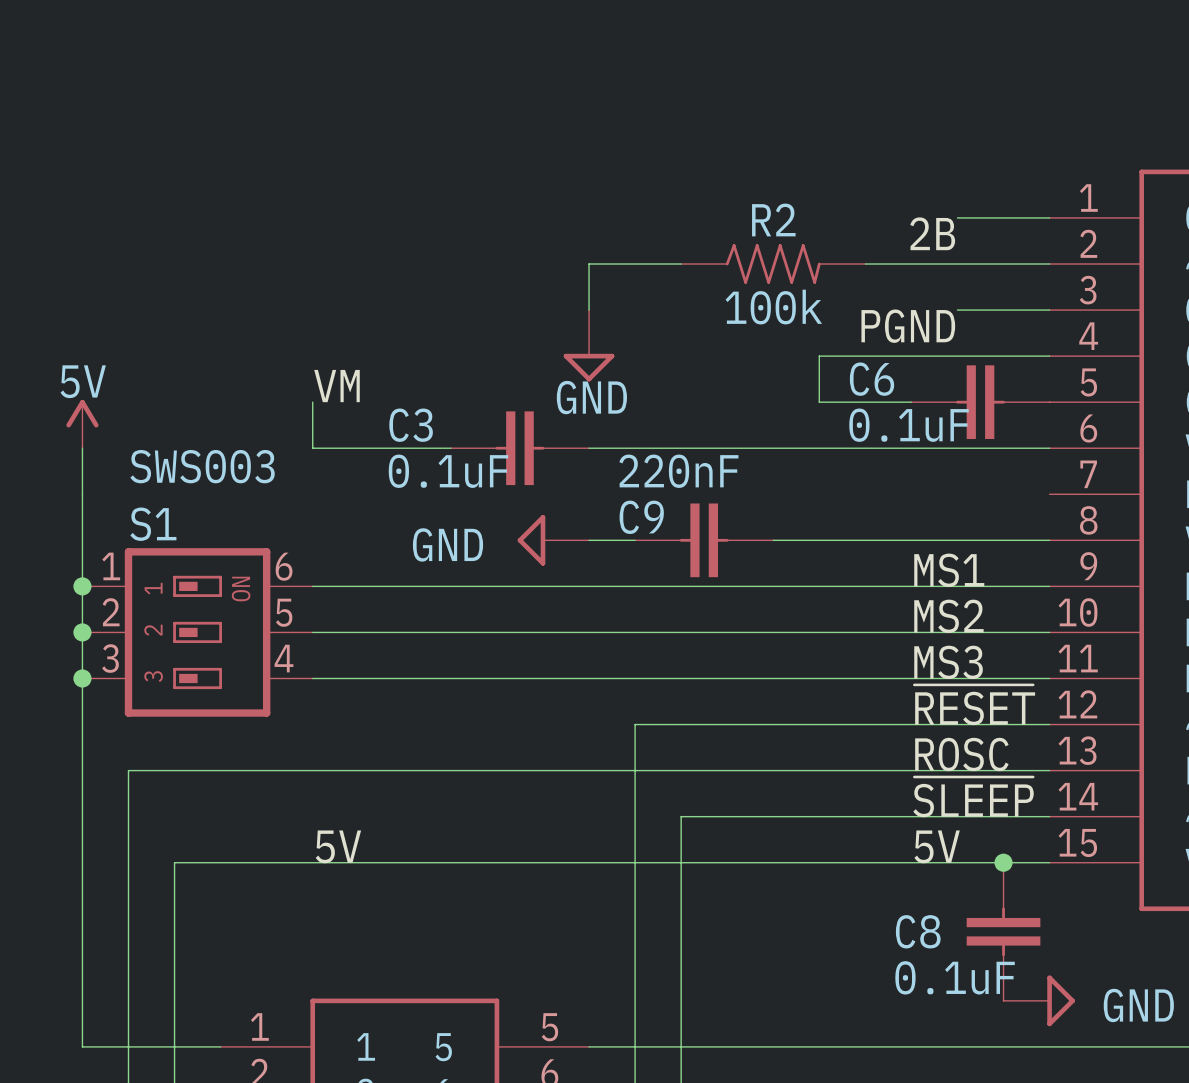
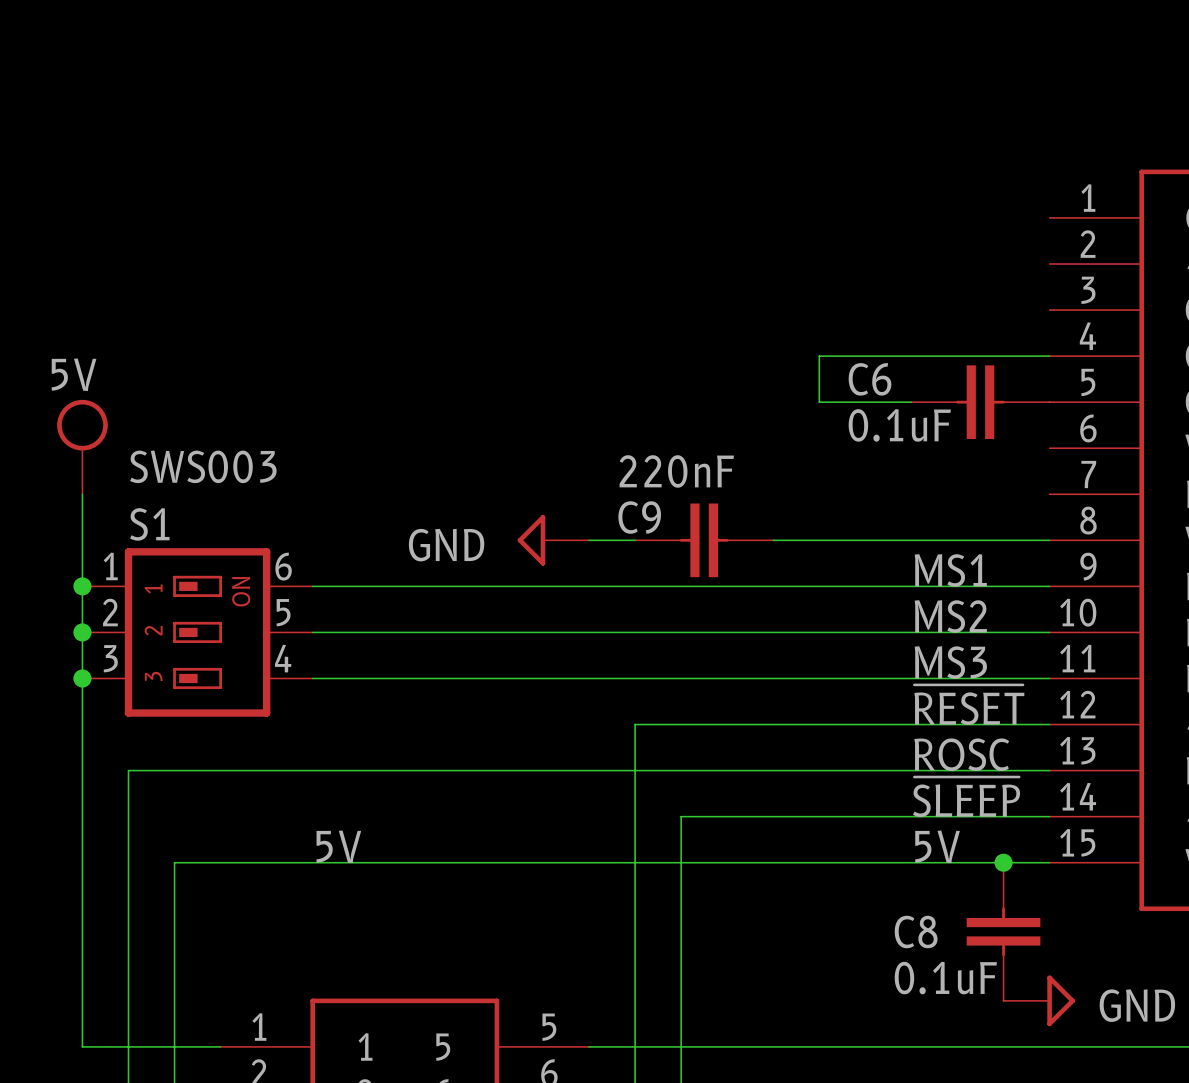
wire: (957, 217) (1049, 217) -> none
label: 2B (932, 233) -> none
wire: (681, 264) (589, 264) (589, 310) -> none
R2: 100k (773, 264) -> none
wire: (865, 264) (1049, 264) -> none
wire: (957, 310) (1049, 310) -> none
label: PGND (908, 326) -> none
power symbol: GND (589, 345) -> none
label: VM (336, 386) -> none
wire: (312, 402) (312, 448) (450, 448) -> none
power symbol: 5V (82, 424) -> none
power symbol: none -> 5V (82, 447)
C3: 0.1uF (519, 448) -> none
wire: (589, 448) (1049, 448) -> none

